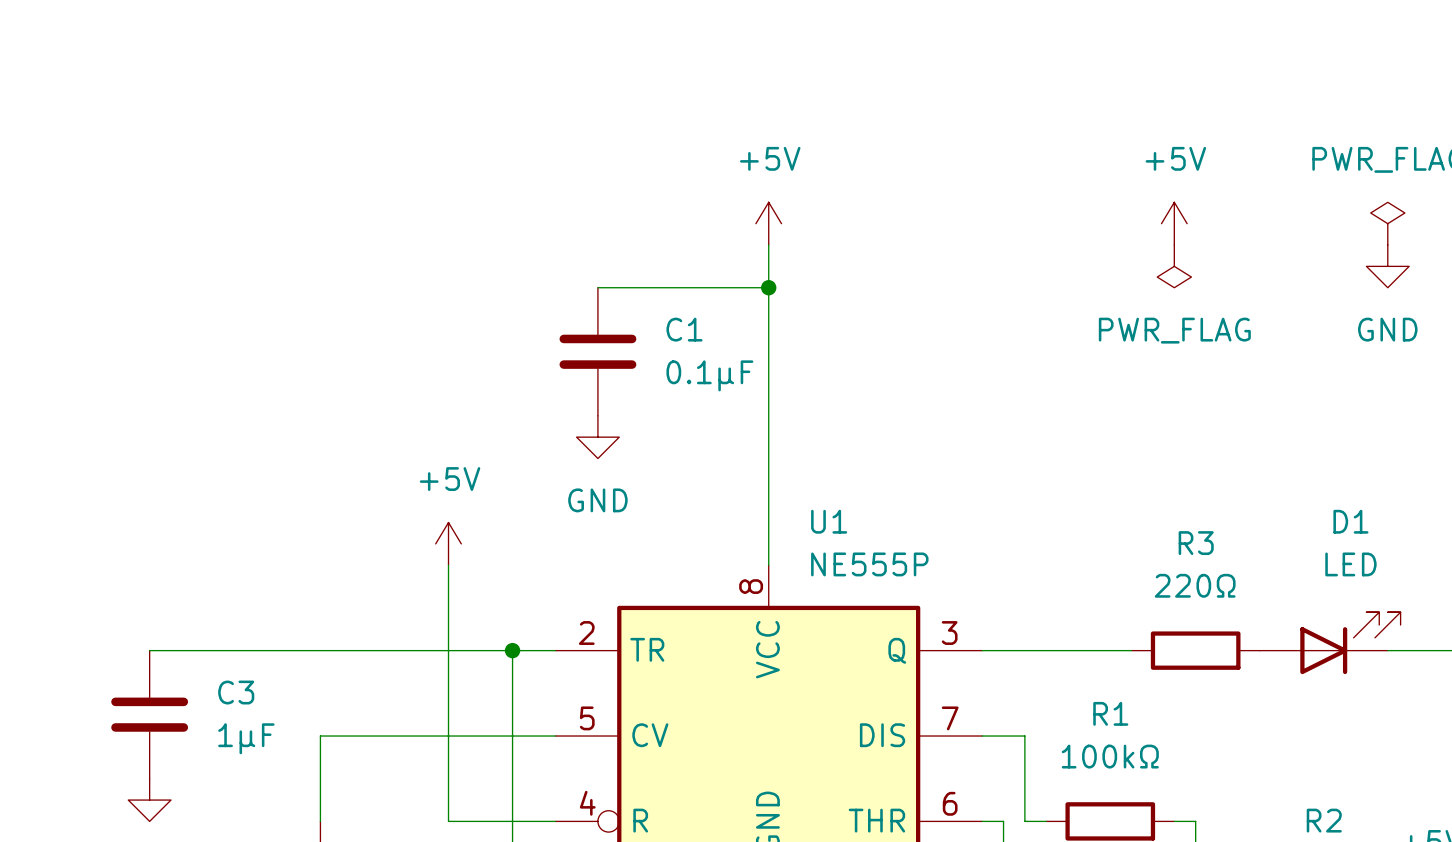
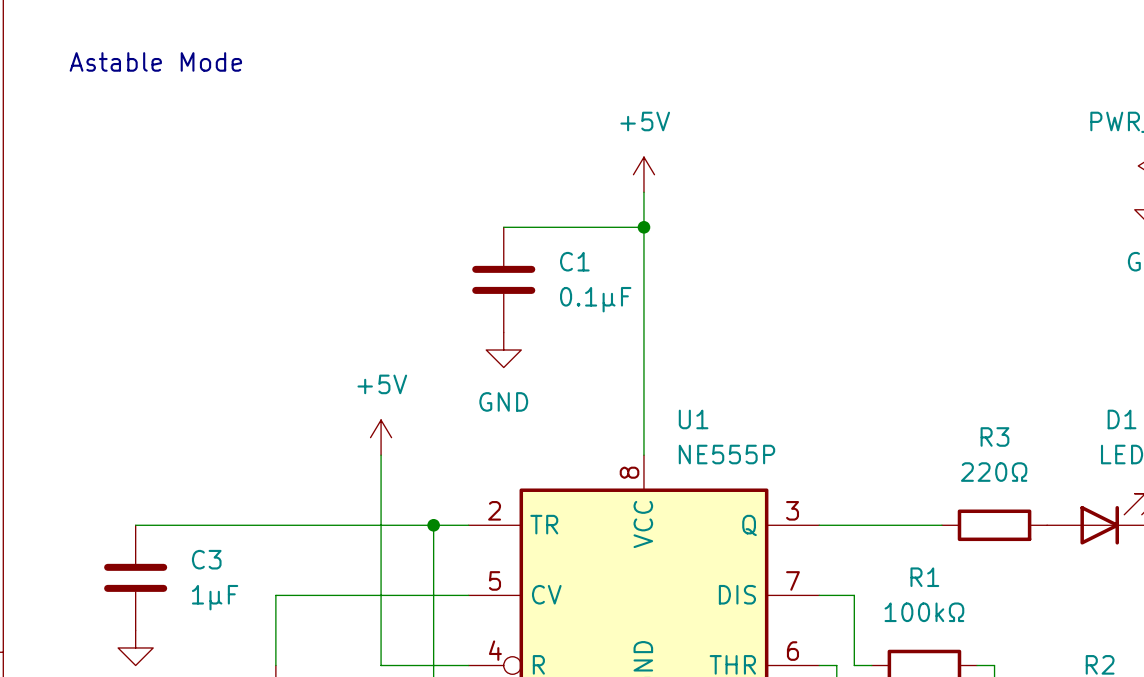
text: none -> Astable Mode (155, 61)
power symbol: +5V (1174, 223) -> none
power symbol: PWR_FLAG (1174, 266) -> none

